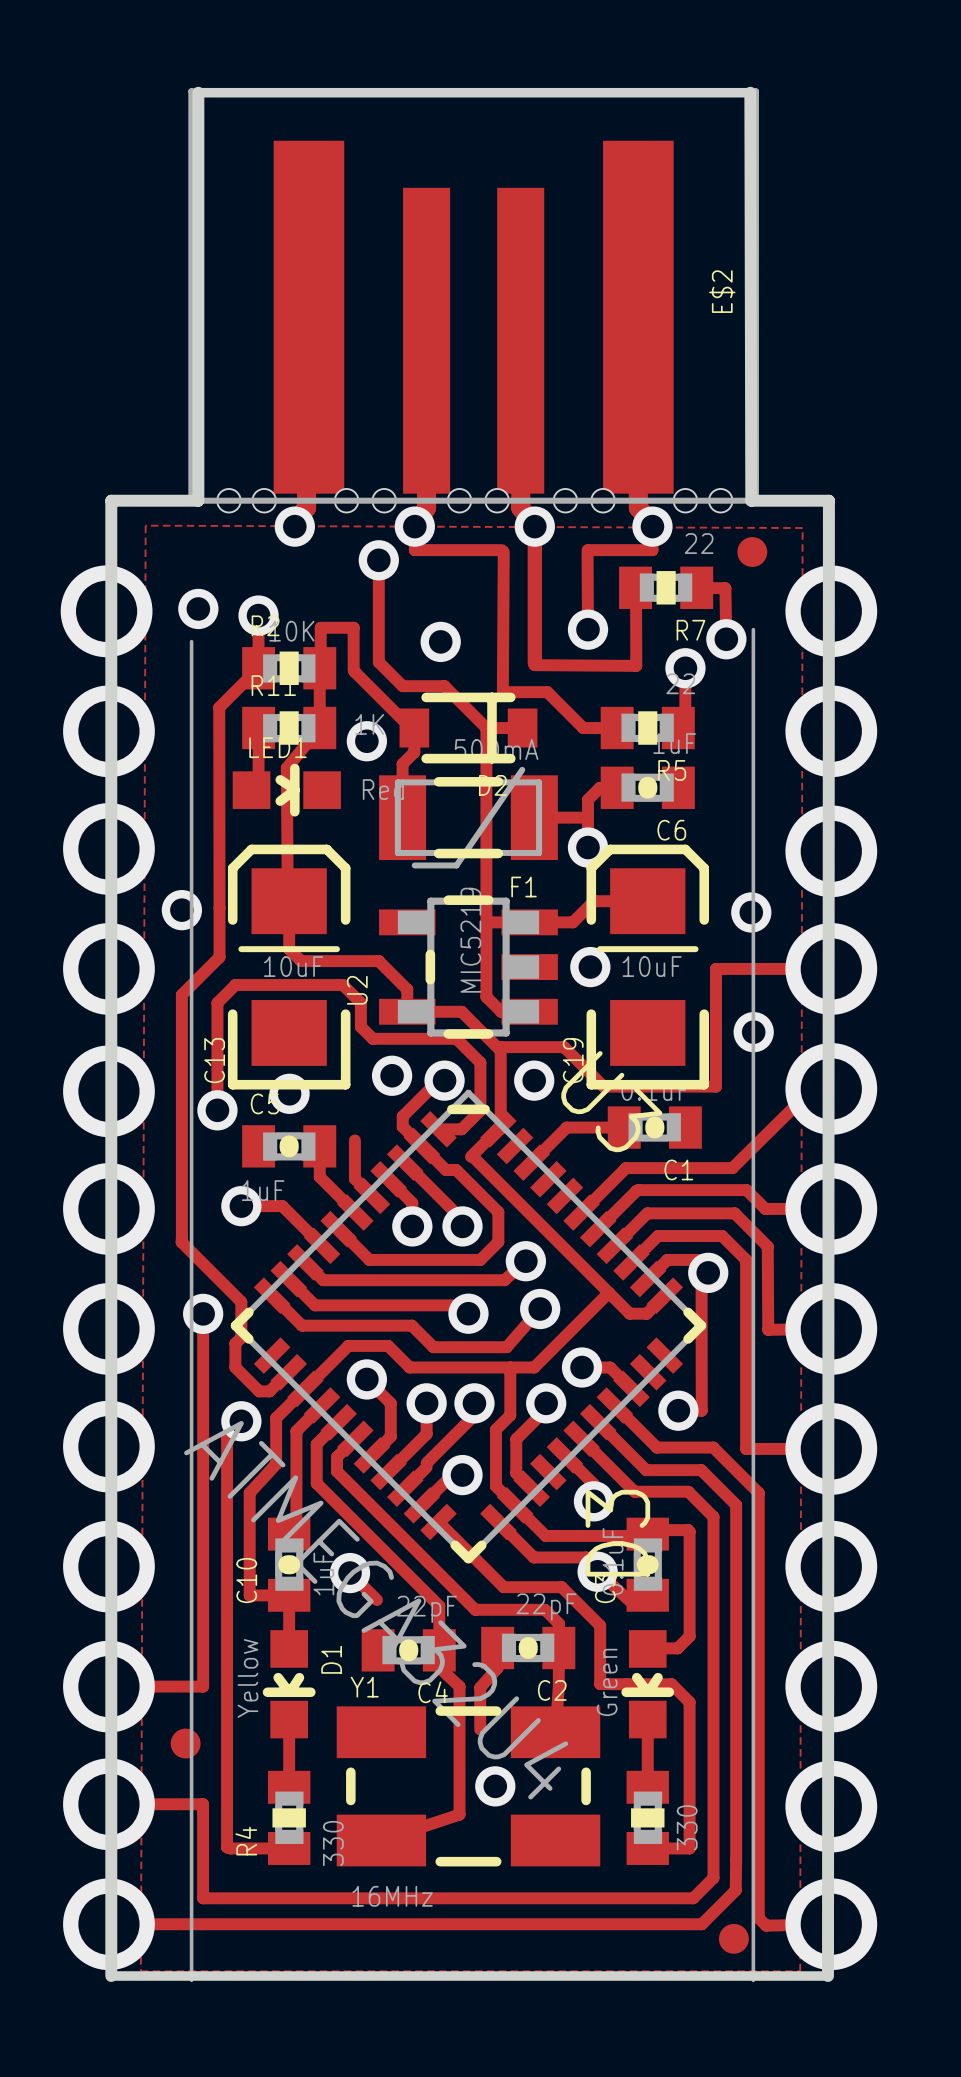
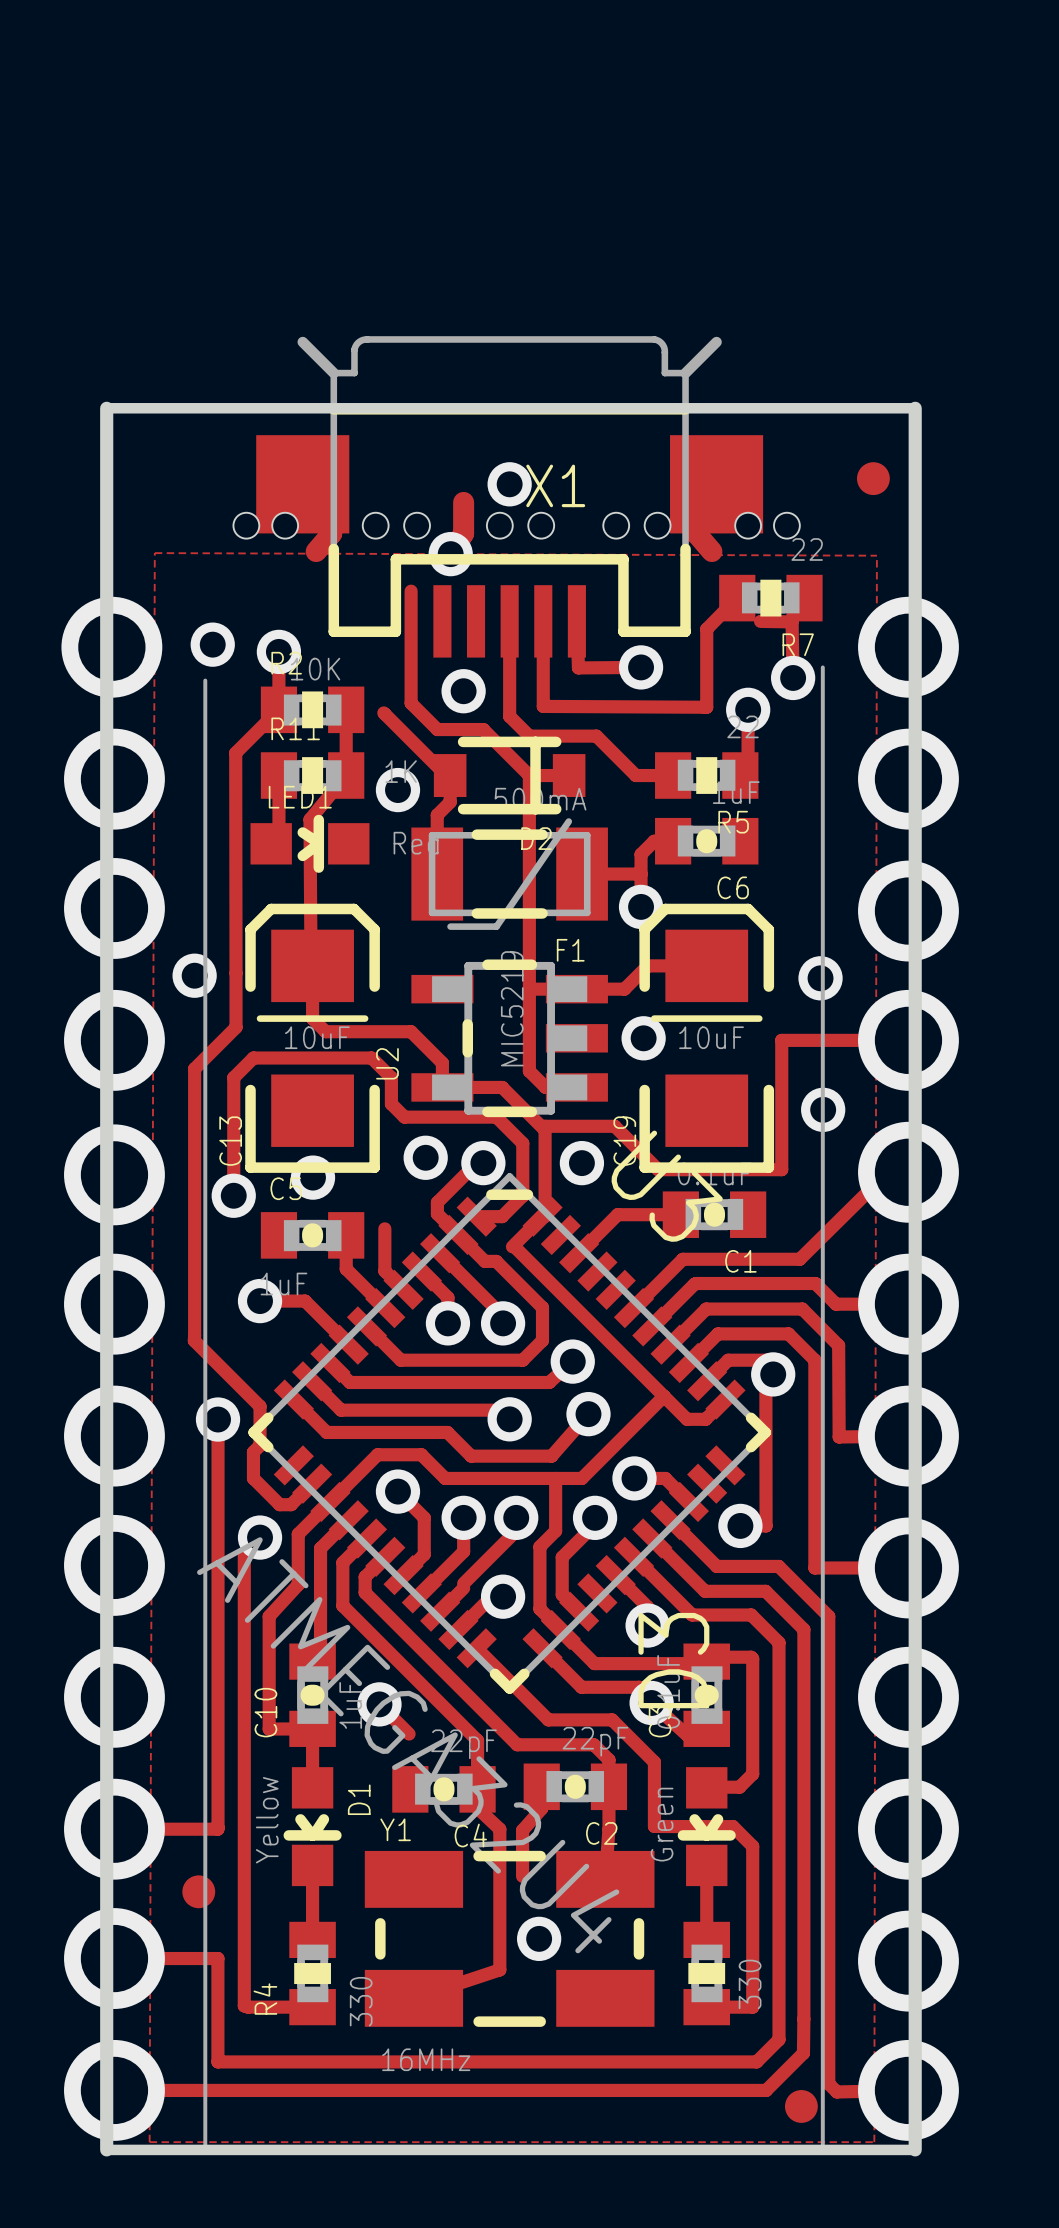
board edge: (198, 92) (198, 500) (111, 500) (111, 1976) (828, 1976) (828, 500) (751, 500) (750, 92) (198, 92) -> (106, 408) (106, 2149) (915, 2149) (915, 408) (106, 408)
E$2: (473, 296) -> none
via: none -> (509, 484)
X1: none -> (509, 496)
track: (520, 484) (520, 507) (534, 526) (534, 663) -> none
via: (294, 526) -> none
via: (534, 526) -> none
via: (652, 526) -> none
track: (652, 528) (652, 550) (588, 550) -> none
track: (414, 531) (414, 550) (501, 550) -> none
track: (587, 550) (588, 629) -> (576, 621) (578, 667) (641, 667)
track: (503, 551) (502, 692) -> (509, 621) (509, 716) (529, 736) (547, 736)
part position: (752, 552) -> (873, 478)
via: (378, 560) -> none
track: none -> (737, 598) (706, 629) (706, 707) (543, 706) (543, 621)
R7 position: (666, 587) -> (770, 598)
track: (636, 590) (636, 665) (534, 665) -> none
via position: (440, 641) -> (463, 691)
track: (320, 646) (320, 627) (353, 627) (353, 670) -> none

